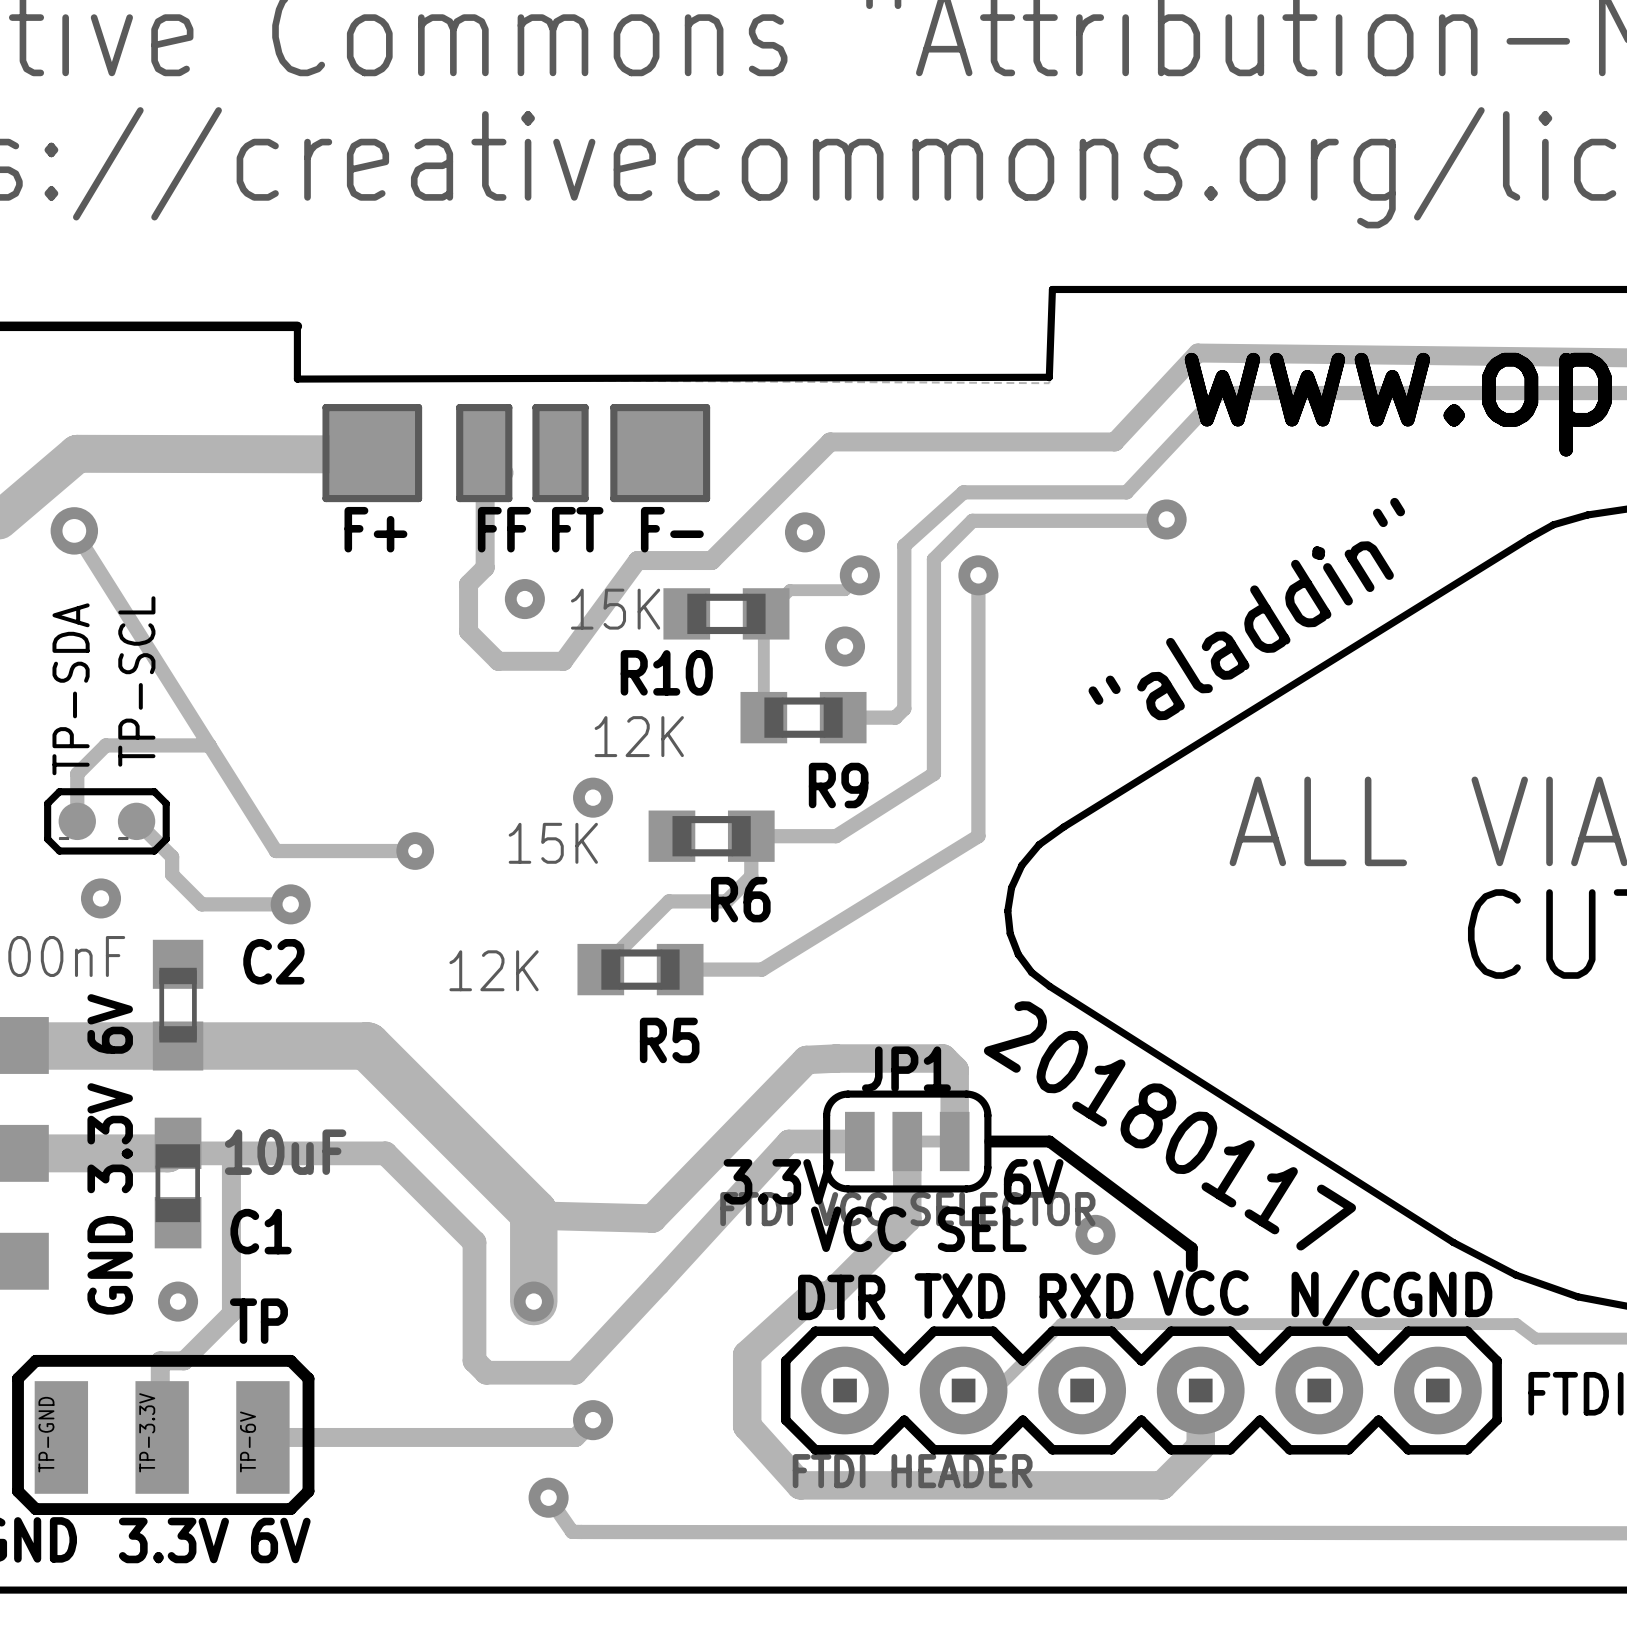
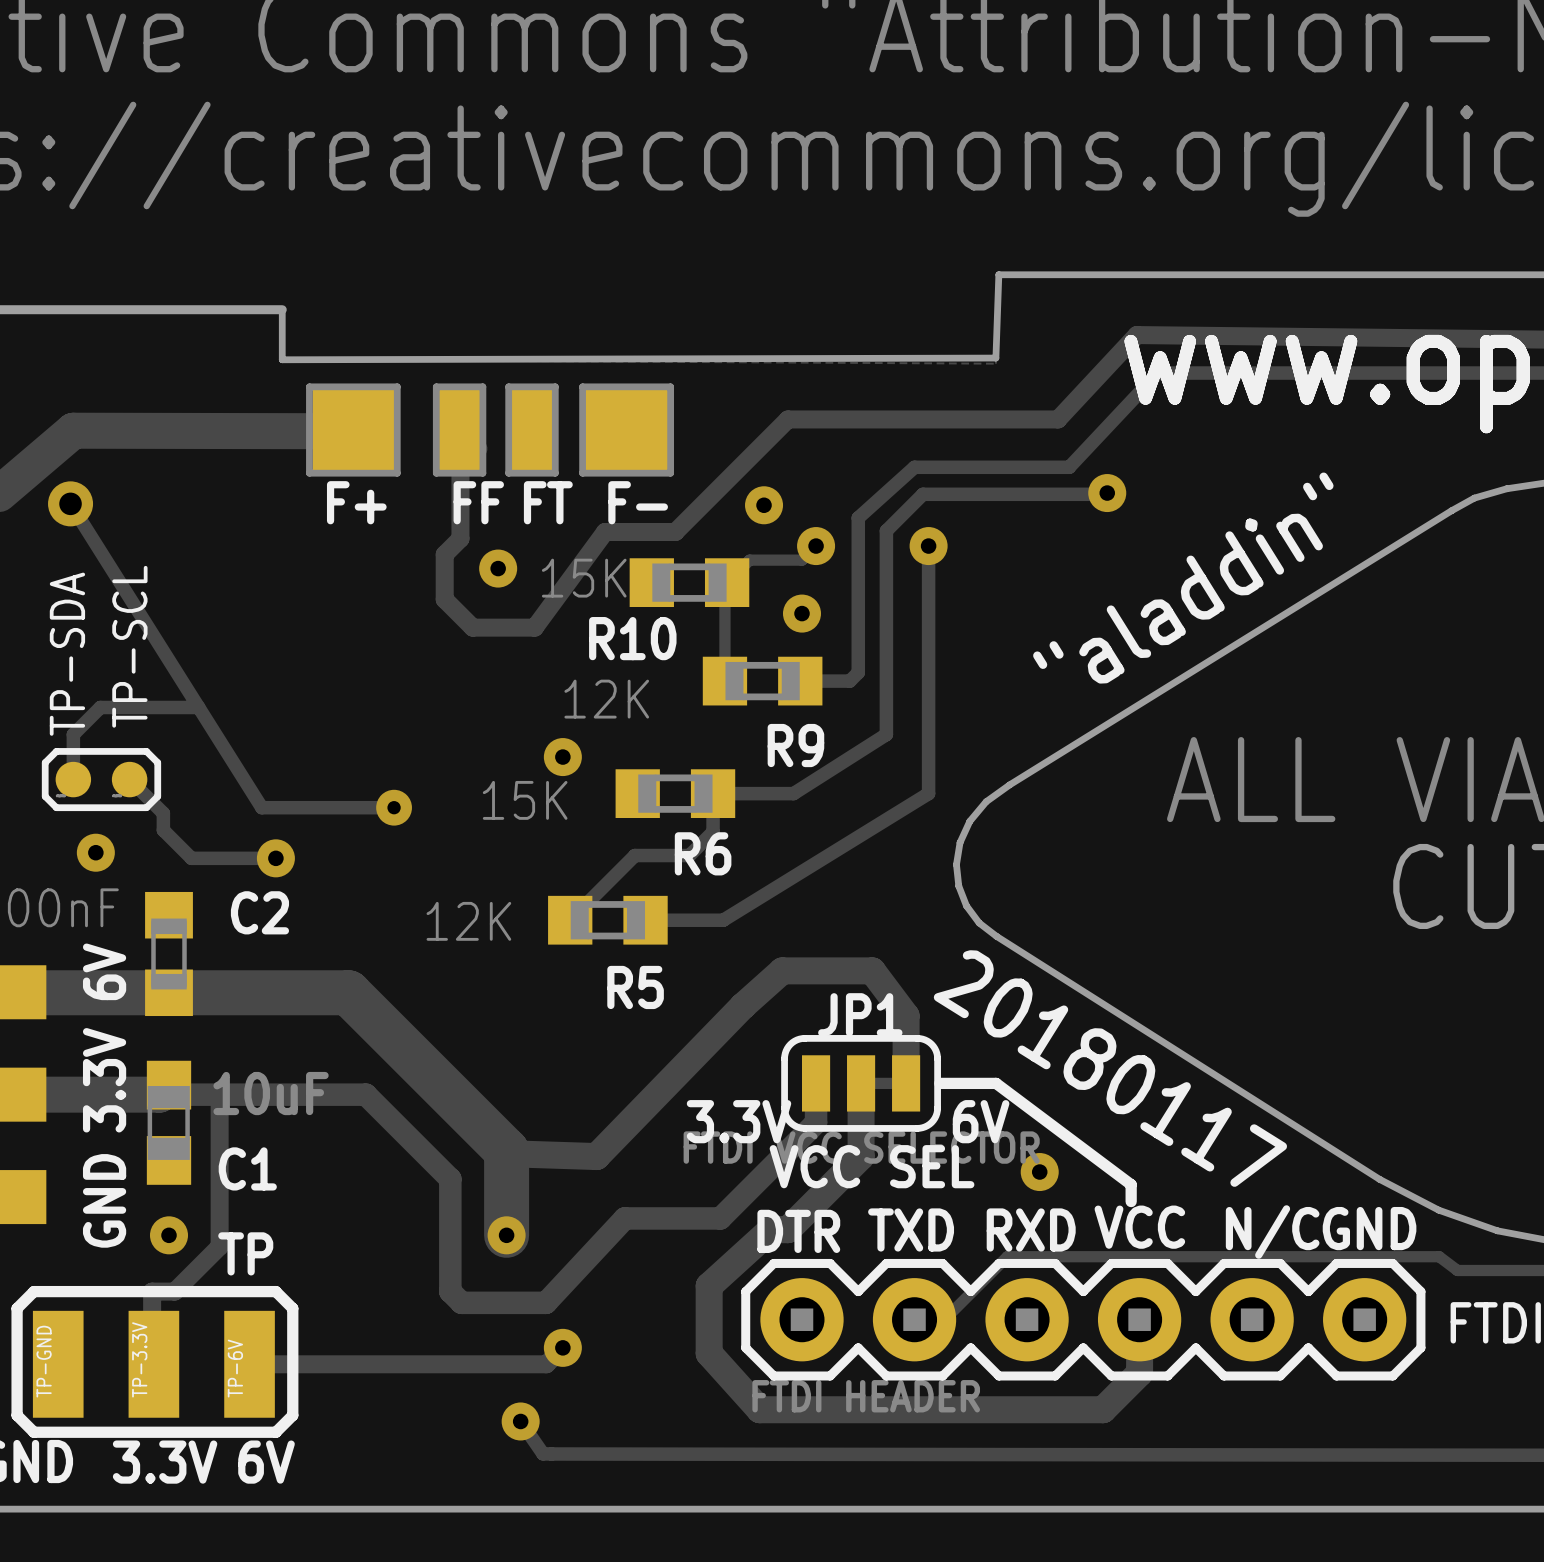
track: (954, 1070) (942, 1058) (806, 1059) (652, 1218) (536, 1215) -> (906, 1015) (872, 970) (782, 970) (742, 1005) (596, 1156) (509, 1153)
track: (859, 1141) (788, 1141) (658, 1283) -> (816, 1083) (816, 1122) (720, 1218) (624, 1218)

